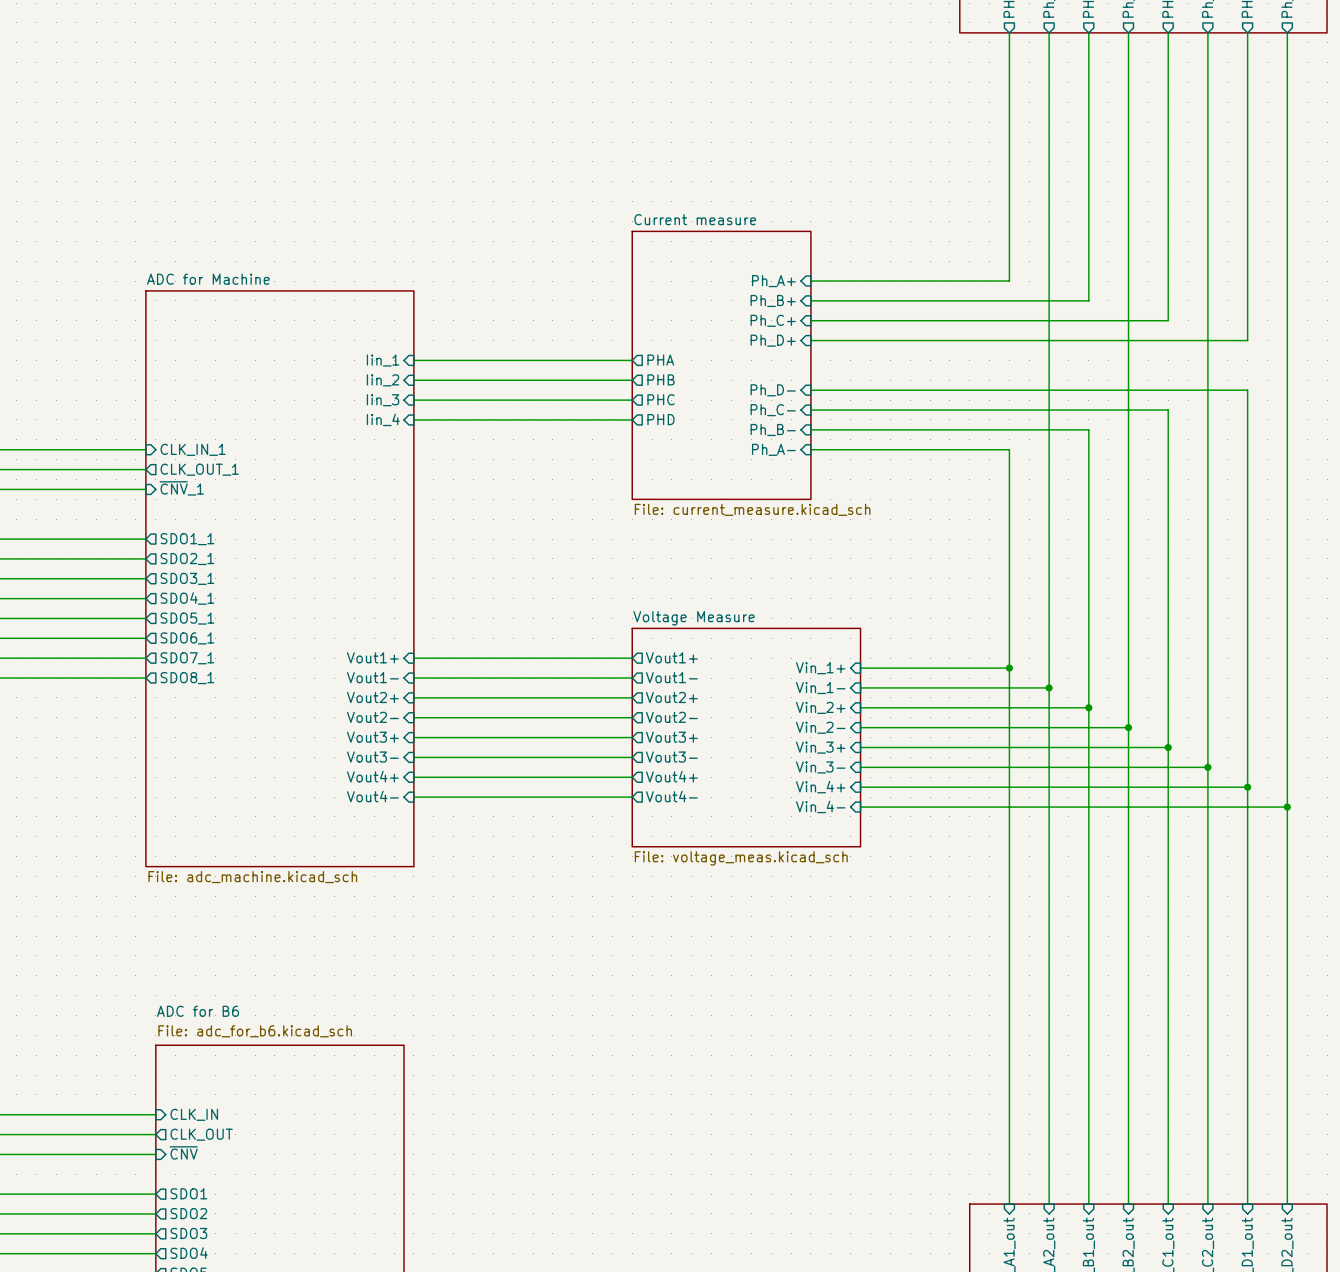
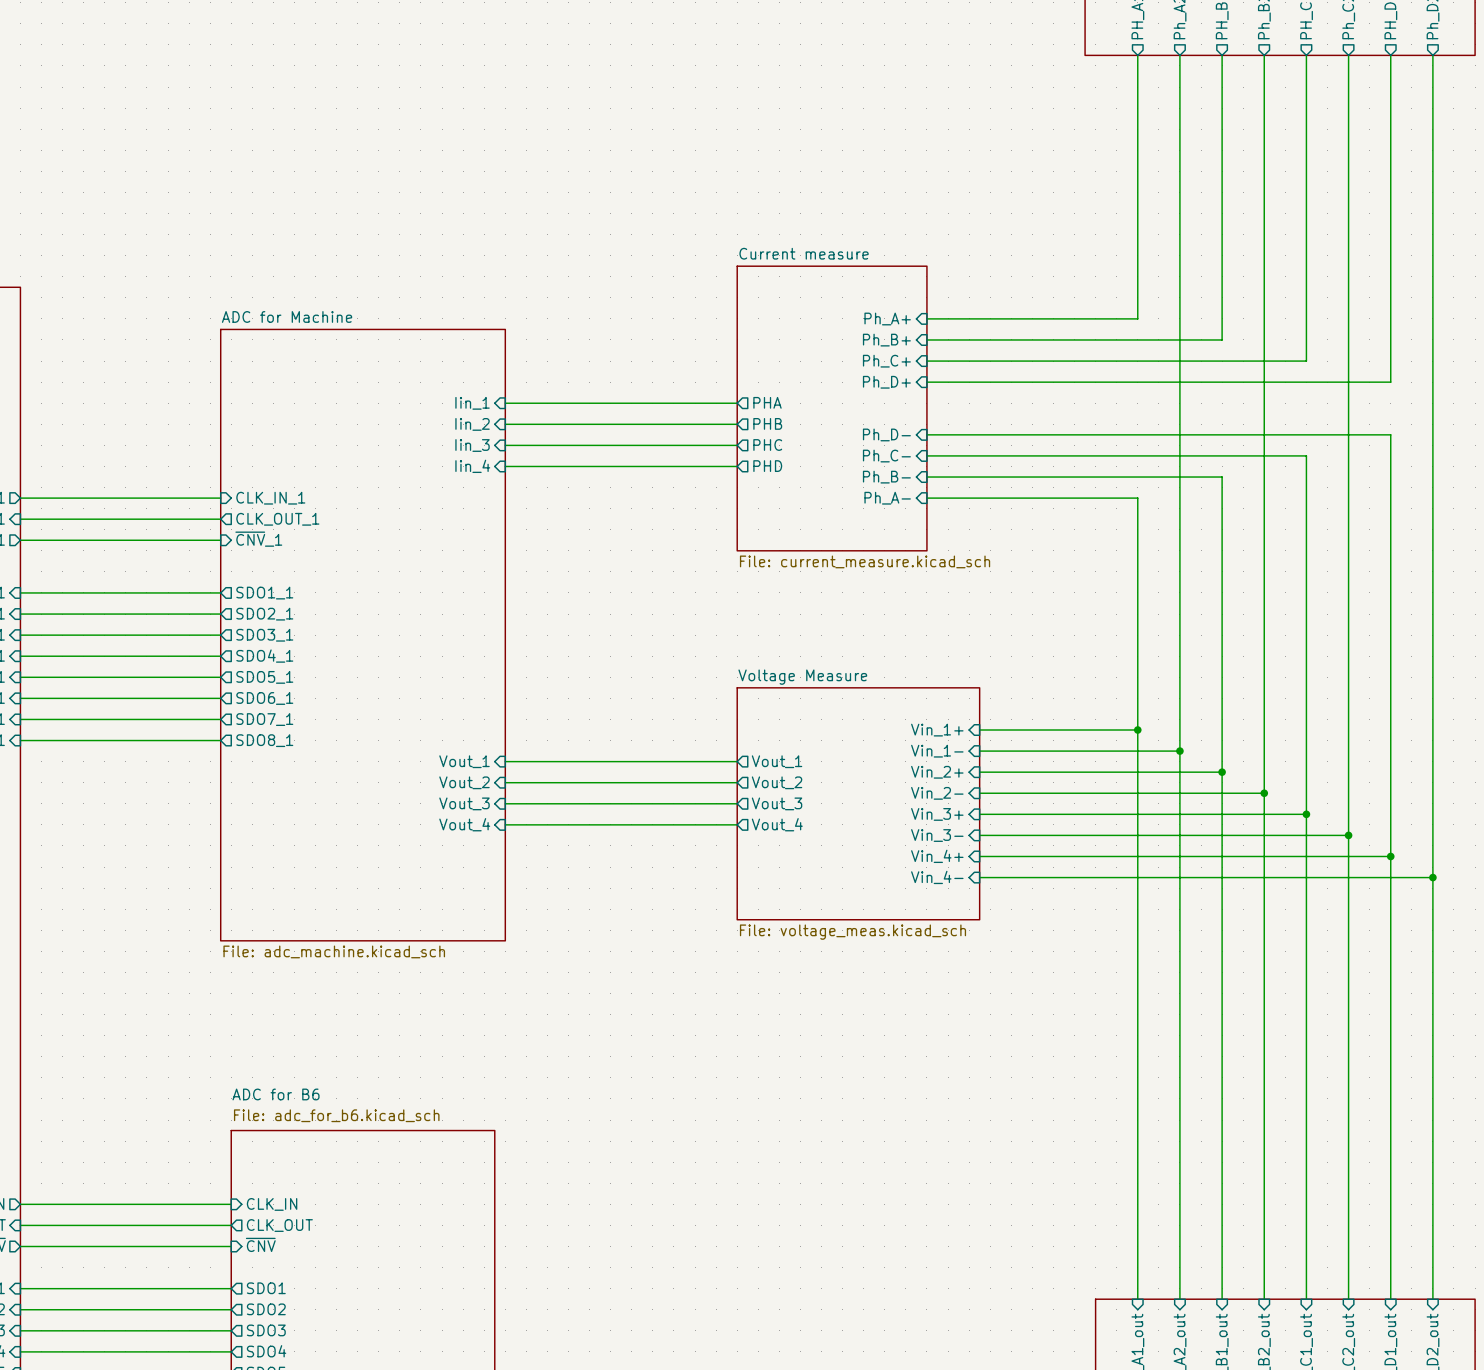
sheet pin: Vout1+ (372, 657) -> none
sheet pin: Vout1+ (671, 657) -> none
wire: (413, 658) (632, 658) -> none
sheet pin: Vout1- (372, 677) -> none
sheet pin: Vout1- (671, 677) -> none
wire: (413, 678) (632, 678) -> none
sheet pin: Vout2+ (372, 697) -> Vout_1 (464, 761)
sheet pin: Vout2+ (671, 697) -> Vout_1 (777, 761)
sheet pin: Vout2- (372, 717) -> Vout_2 (464, 782)
sheet pin: Vout2- (671, 717) -> Vout_2 (777, 782)
sheet pin: Vout3+ (372, 737) -> Vout_3 (464, 803)
sheet pin: Vout3+ (671, 737) -> Vout_3 (777, 803)
sheet pin: Vout3- (372, 757) -> Vout_4 (464, 824)
sheet pin: Vout3- (671, 757) -> Vout_4 (777, 824)
sheet pin: Vout4+ (372, 776) -> none
sheet pin: Vout4+ (671, 776) -> none
wire: (413, 777) (632, 777) -> none
sheet pin: Vout4- (372, 796) -> none
sheet pin: Vout4- (671, 796) -> none
wire: (413, 797) (632, 797) -> none

